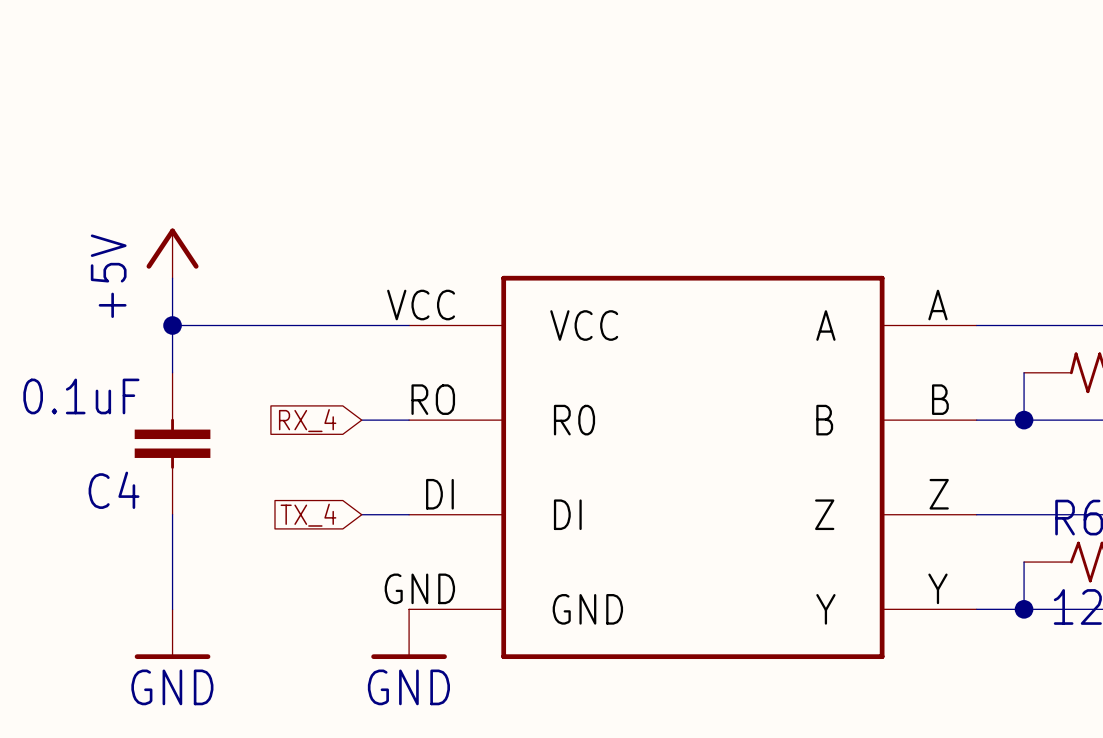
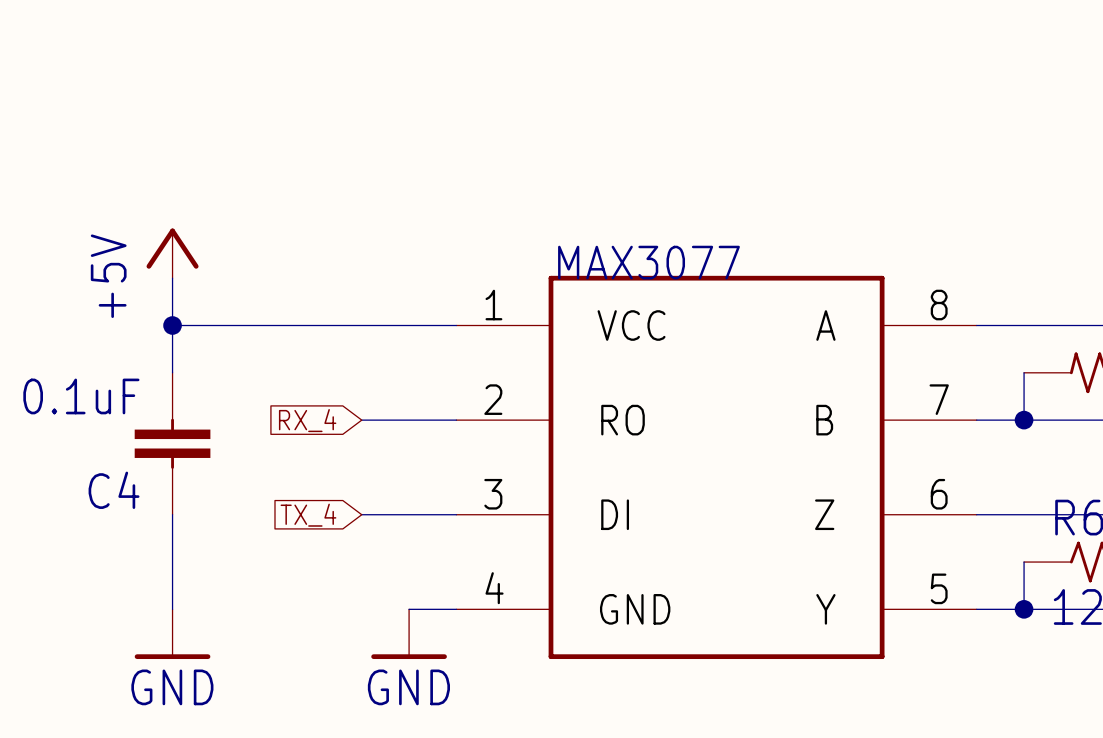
part: (692, 467) -> none
part: none -> (716, 467)

